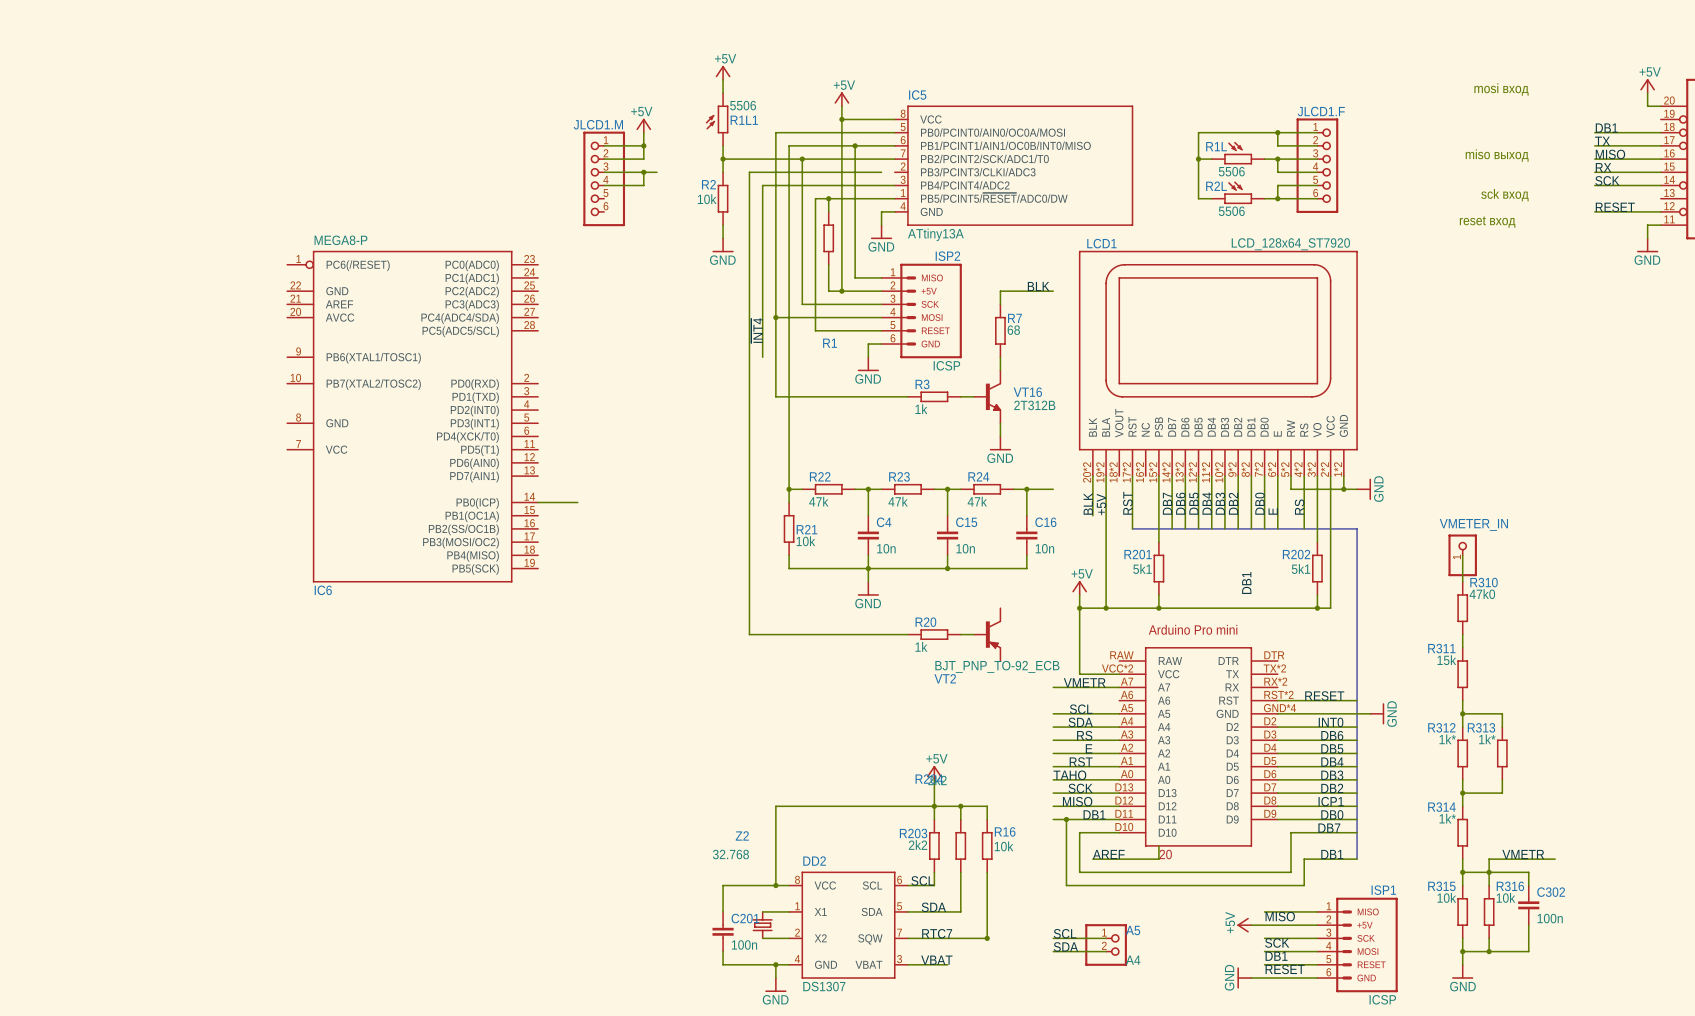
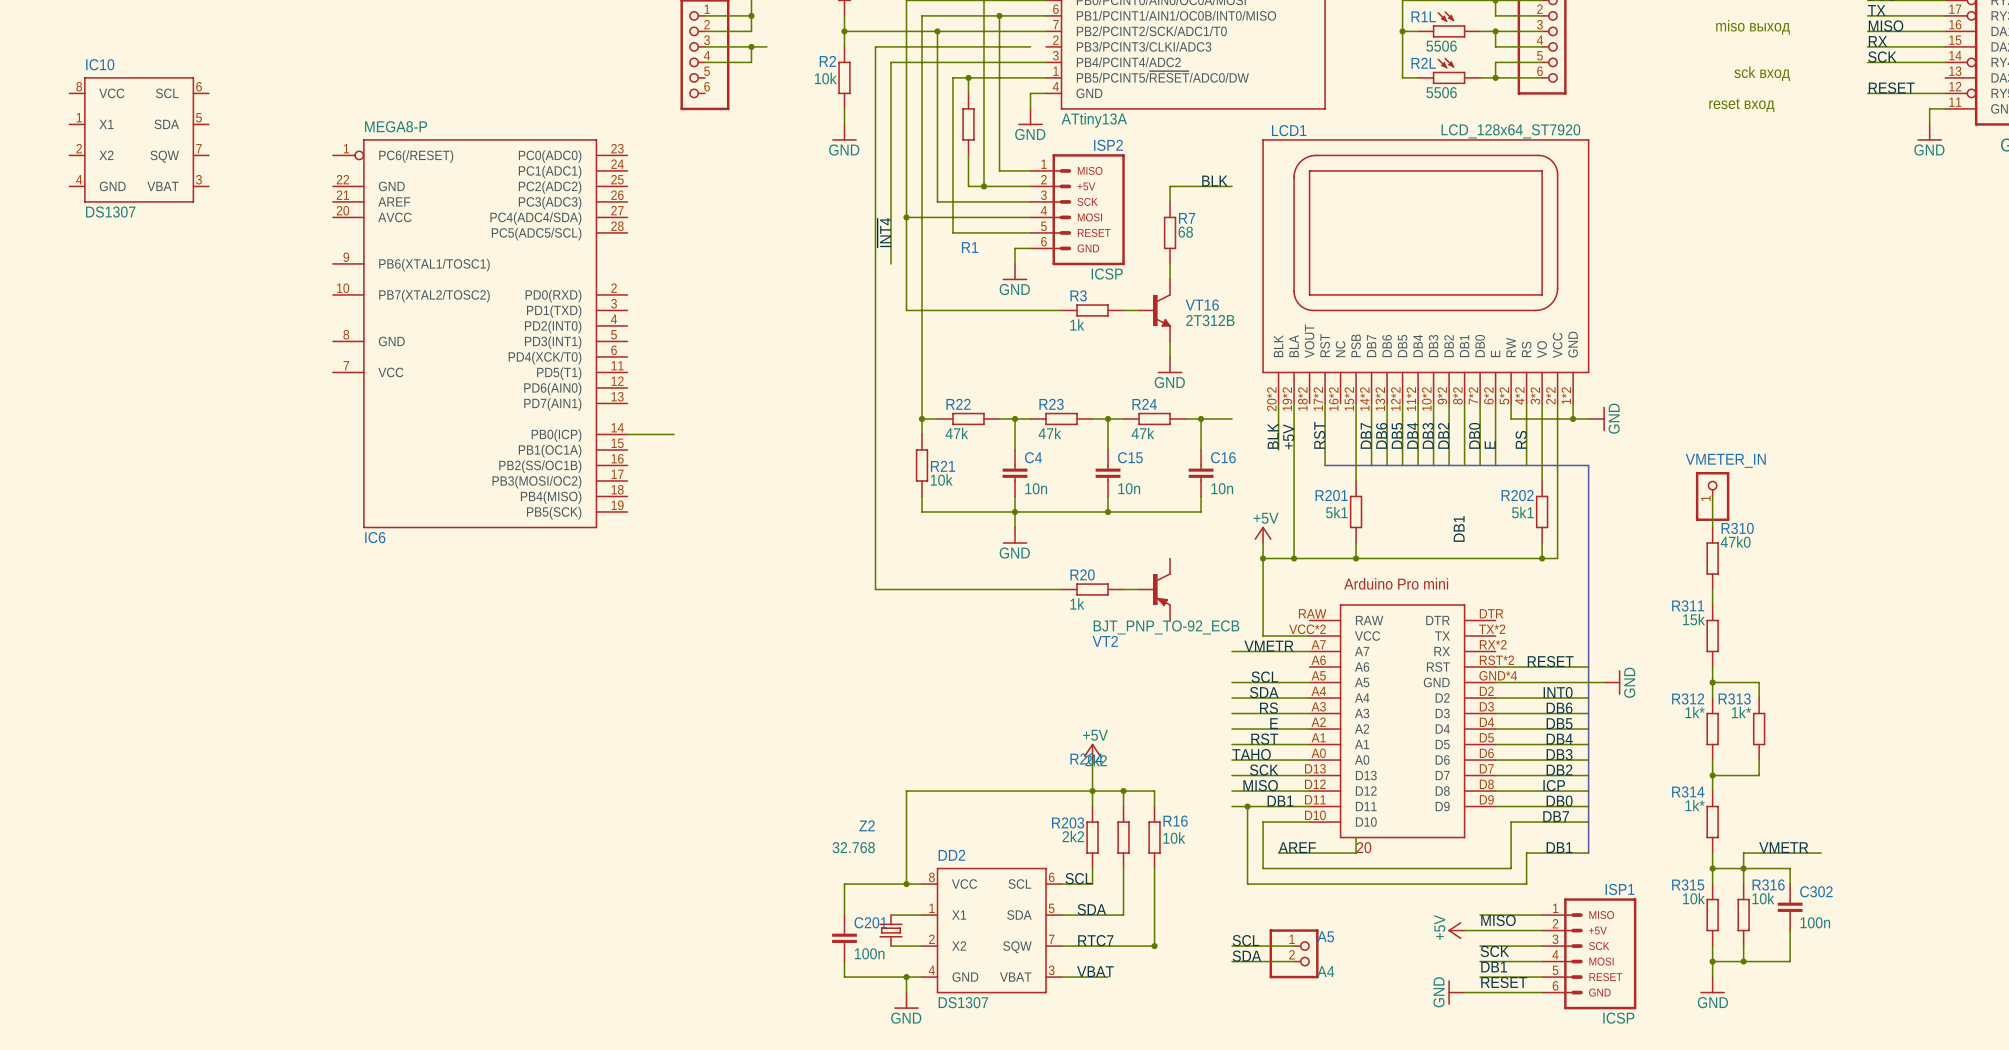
IC10: none -> DS1307 (139, 139)
label: ICP1 (1331, 801) -> ICP (1554, 785)

